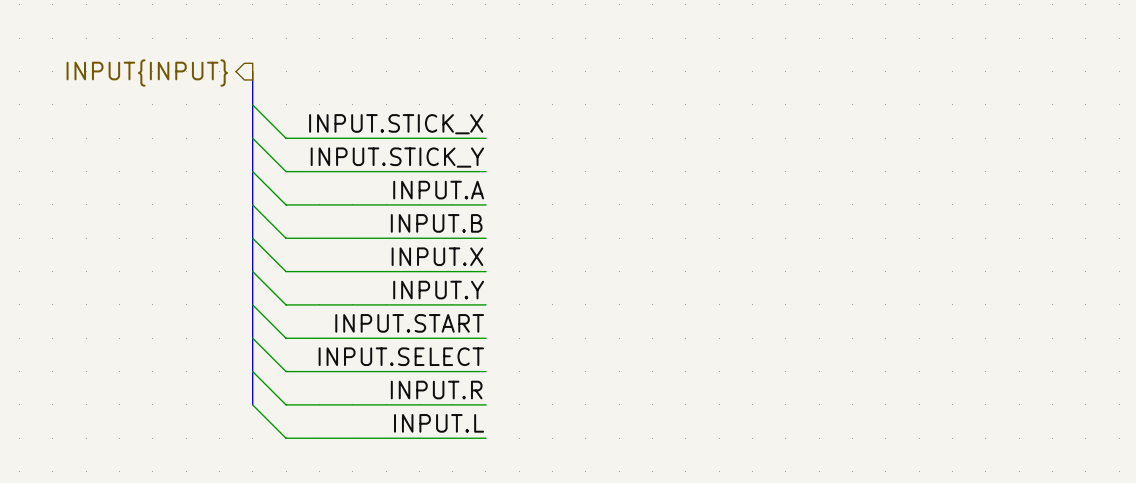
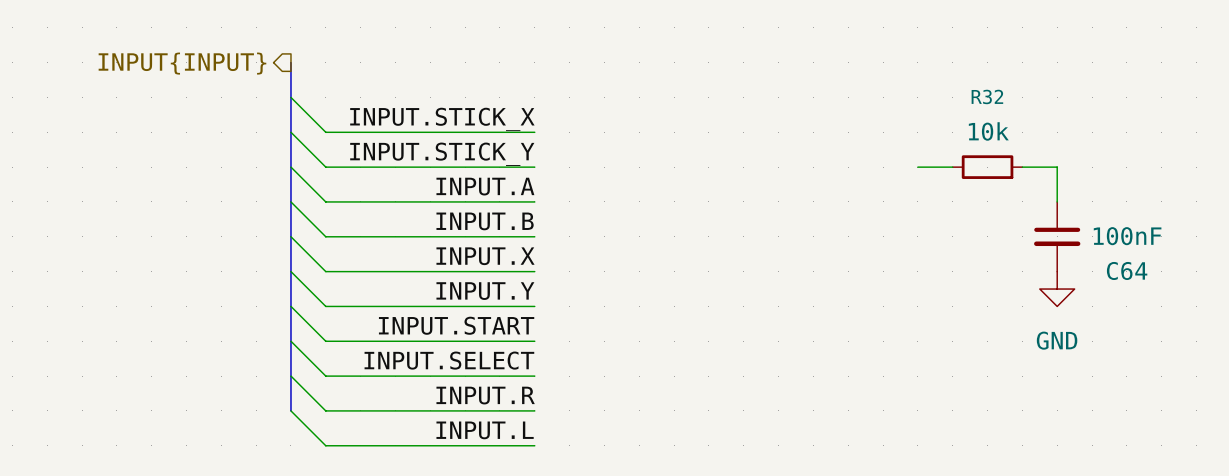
wire: none -> (917, 167) (952, 167)
R32: none -> 10k (987, 167)
wire: none -> (1022, 167) (1057, 167) (1057, 201)
C64: none -> 100nF (1057, 236)
power symbol: none -> GND (1057, 289)

